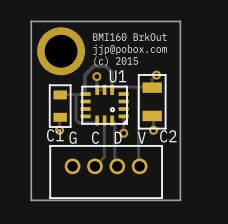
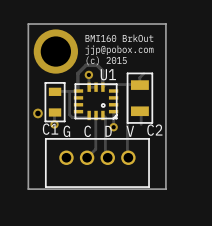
via: (156, 75) -> none
via: none -> (37, 113)
via: (153, 130) -> none

